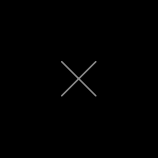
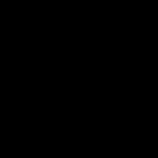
no-connect mark: (78, 78) -> none

